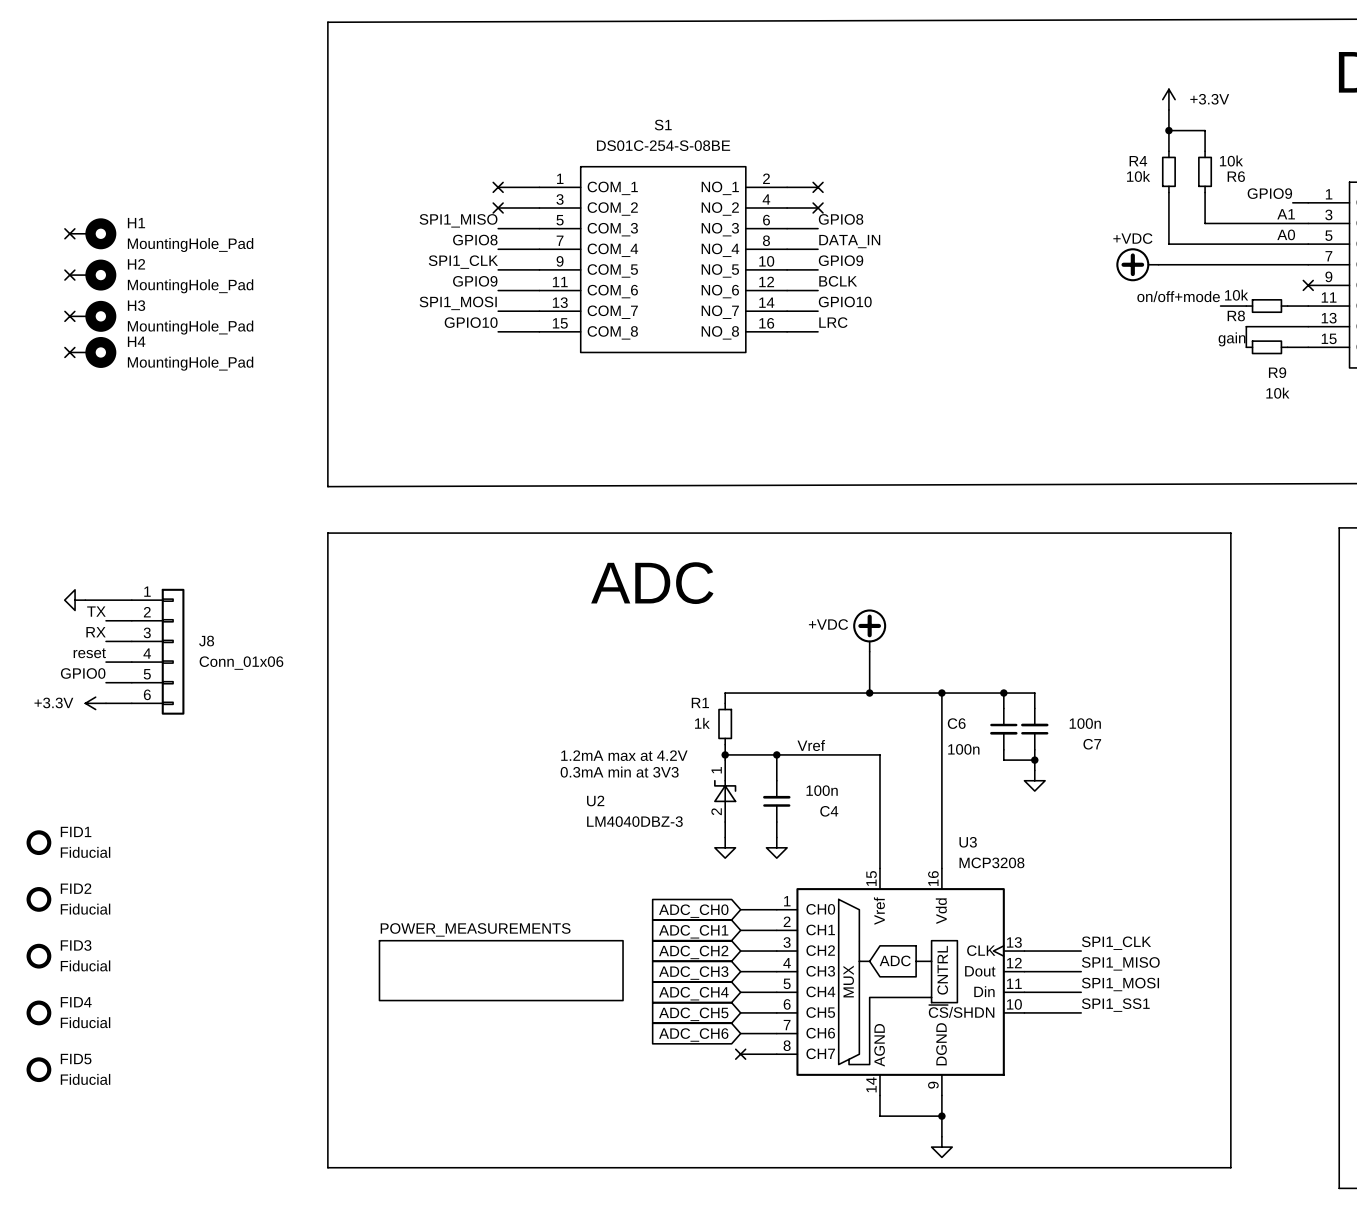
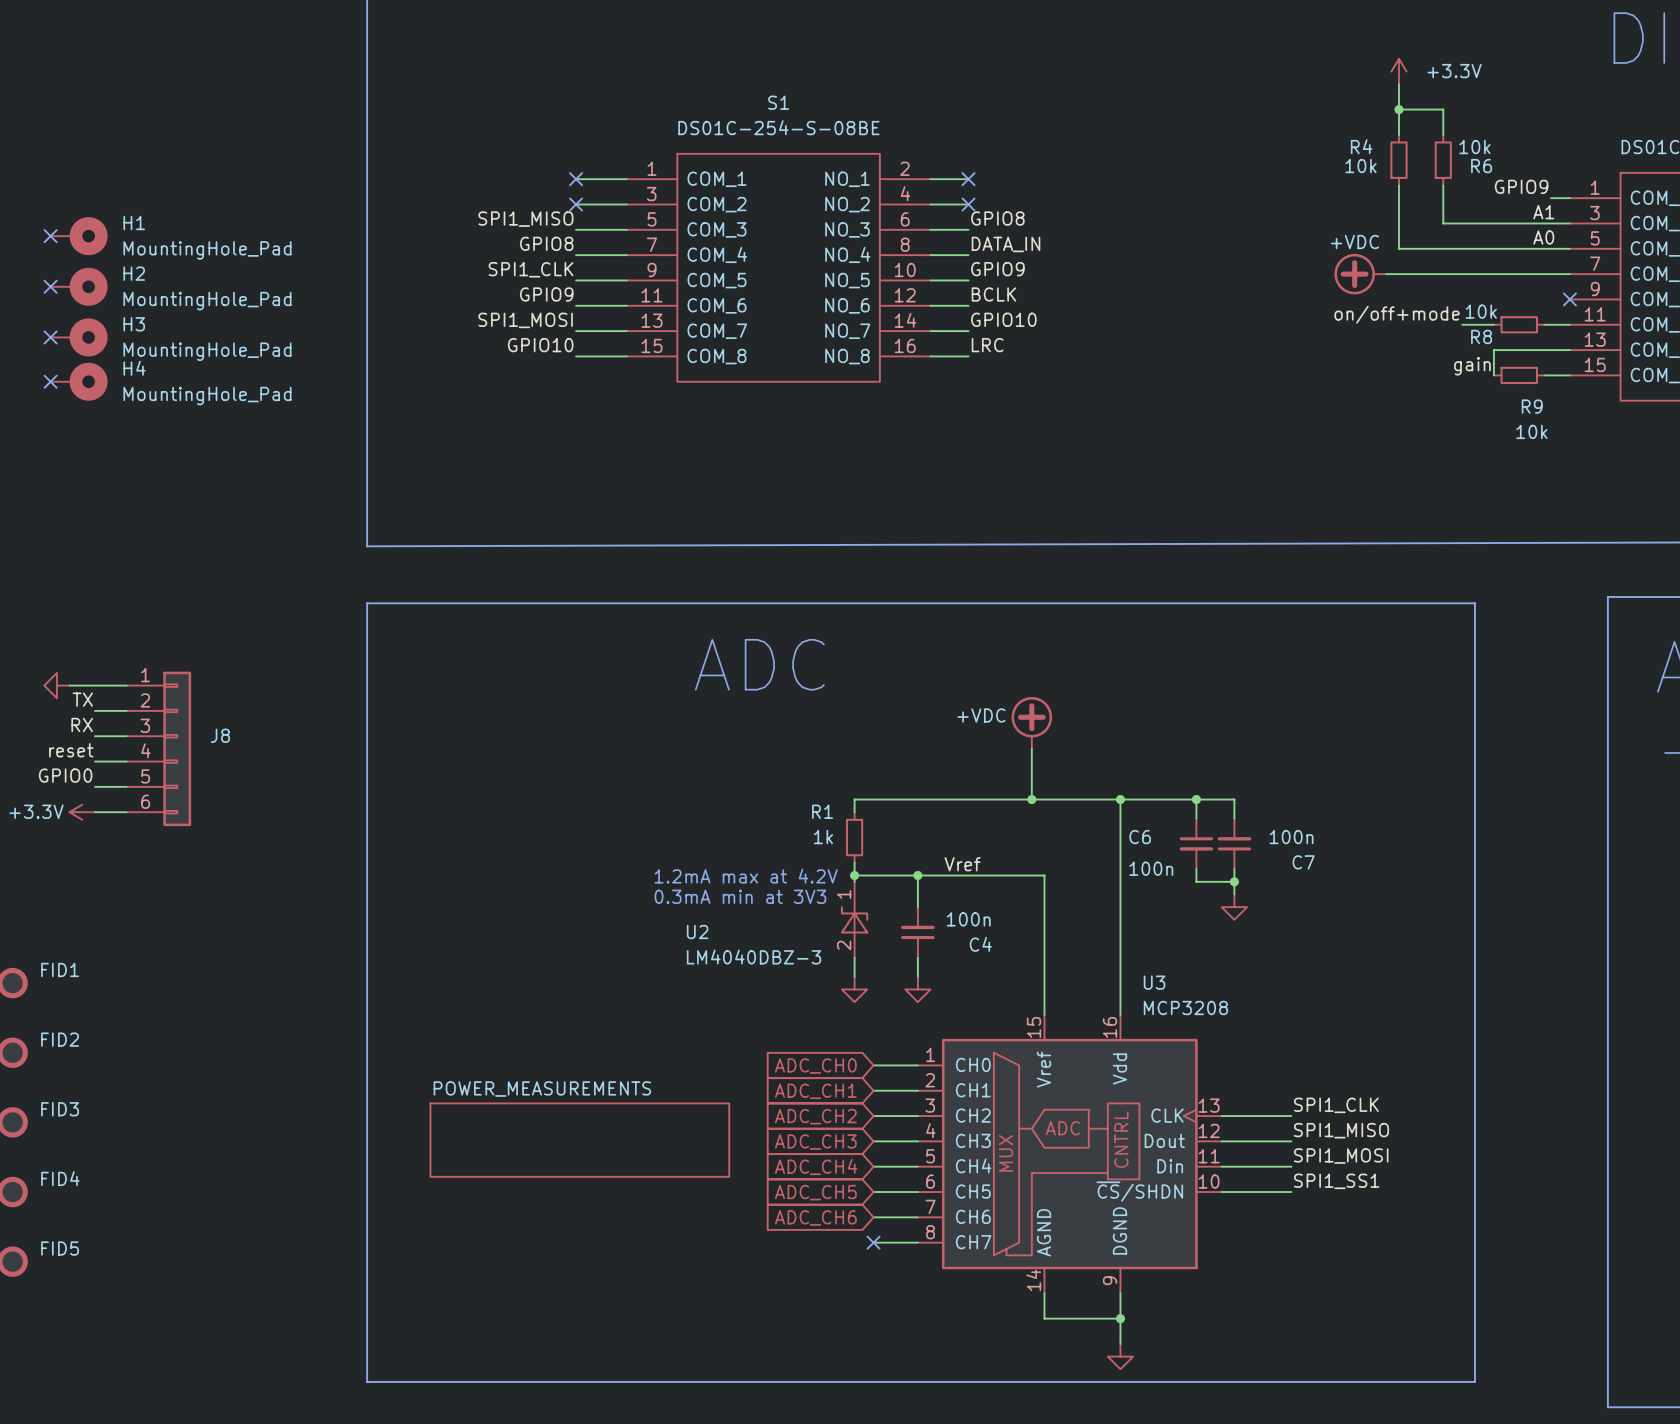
J8 value: Conn_01x06 (241, 663) -> none
FID1 value: Fiducial (85, 852) -> none
FID2 value: Fiducial (85, 909) -> none
FID3 value: Fiducial (85, 965) -> none
FID4 value: Fiducial (85, 1022) -> none
FID5 value: Fiducial (85, 1079) -> none

